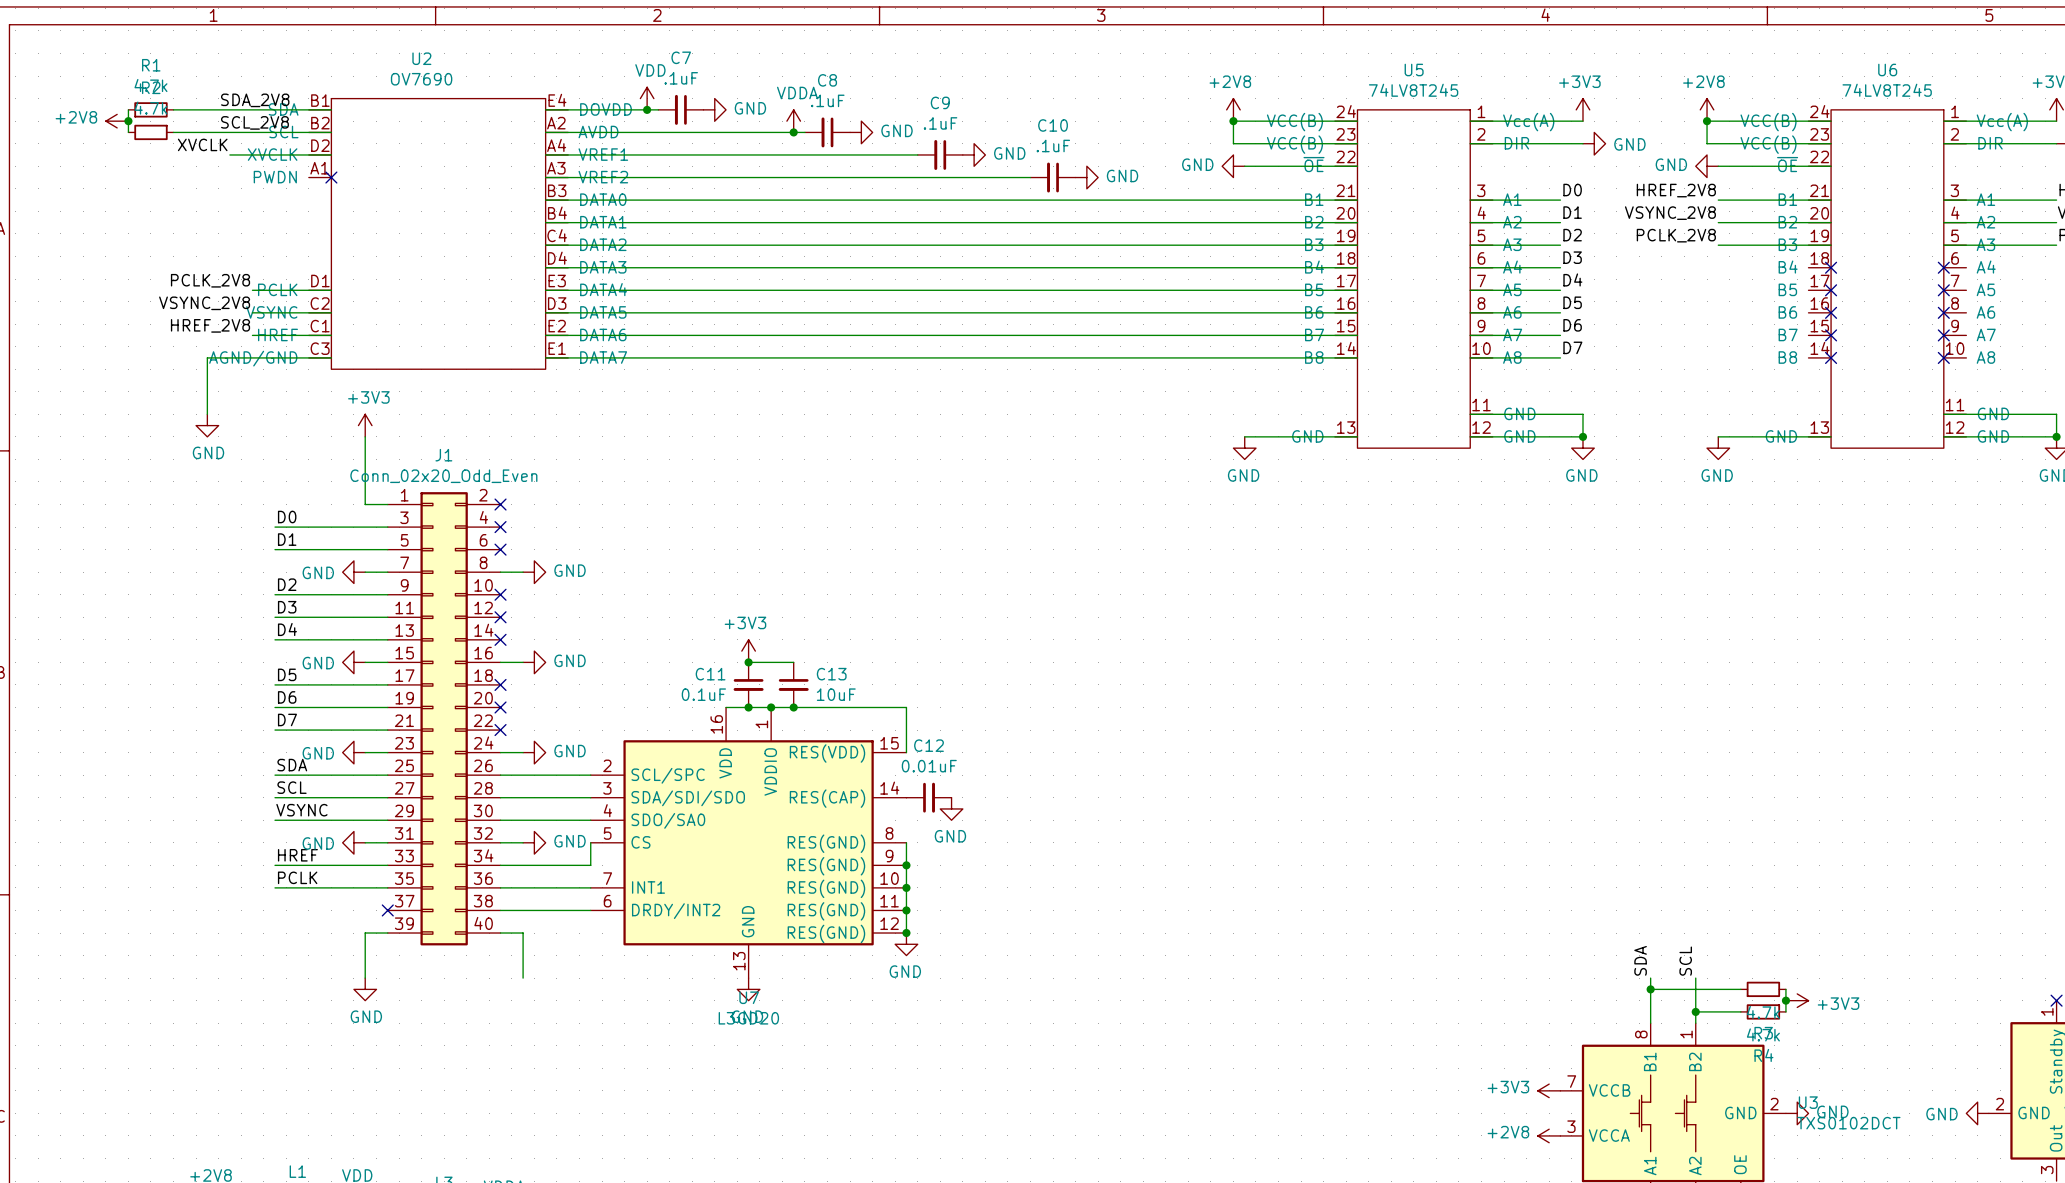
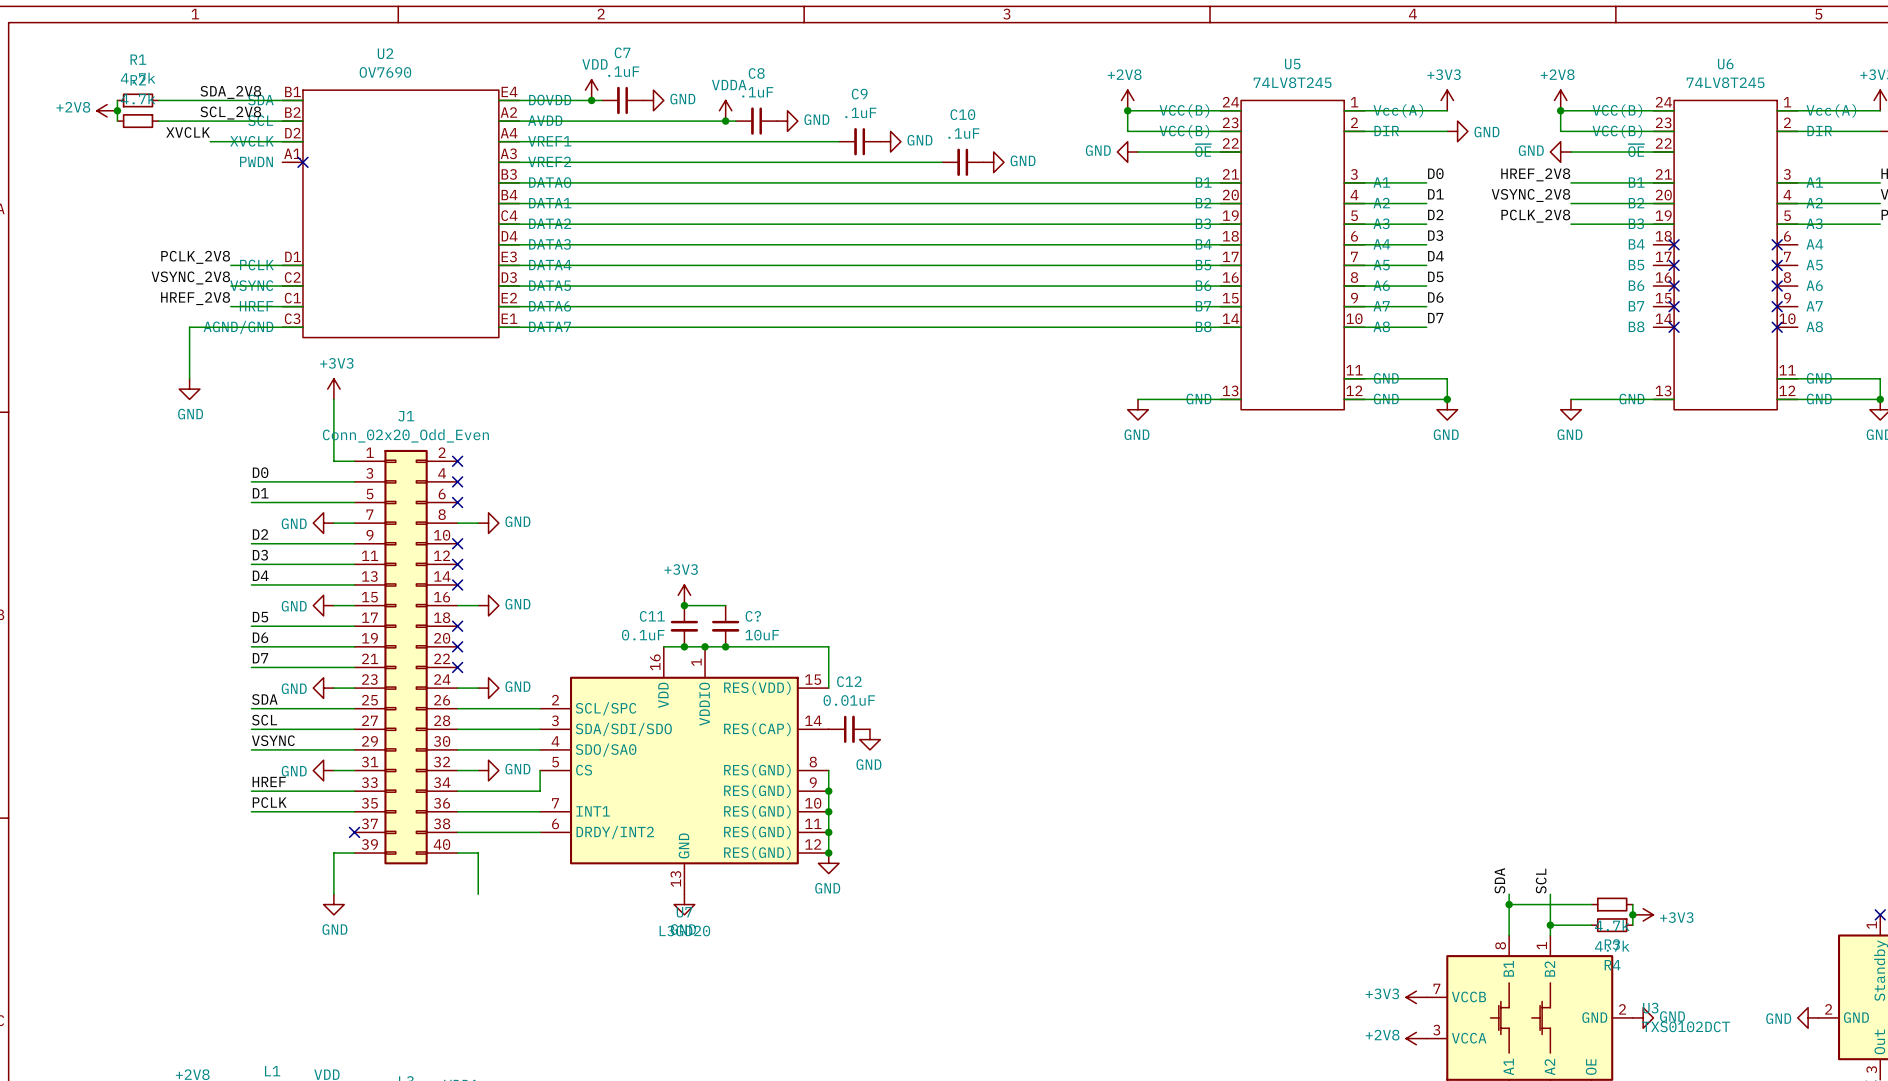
C13 name: C13 (831, 674) -> C? (753, 616)

